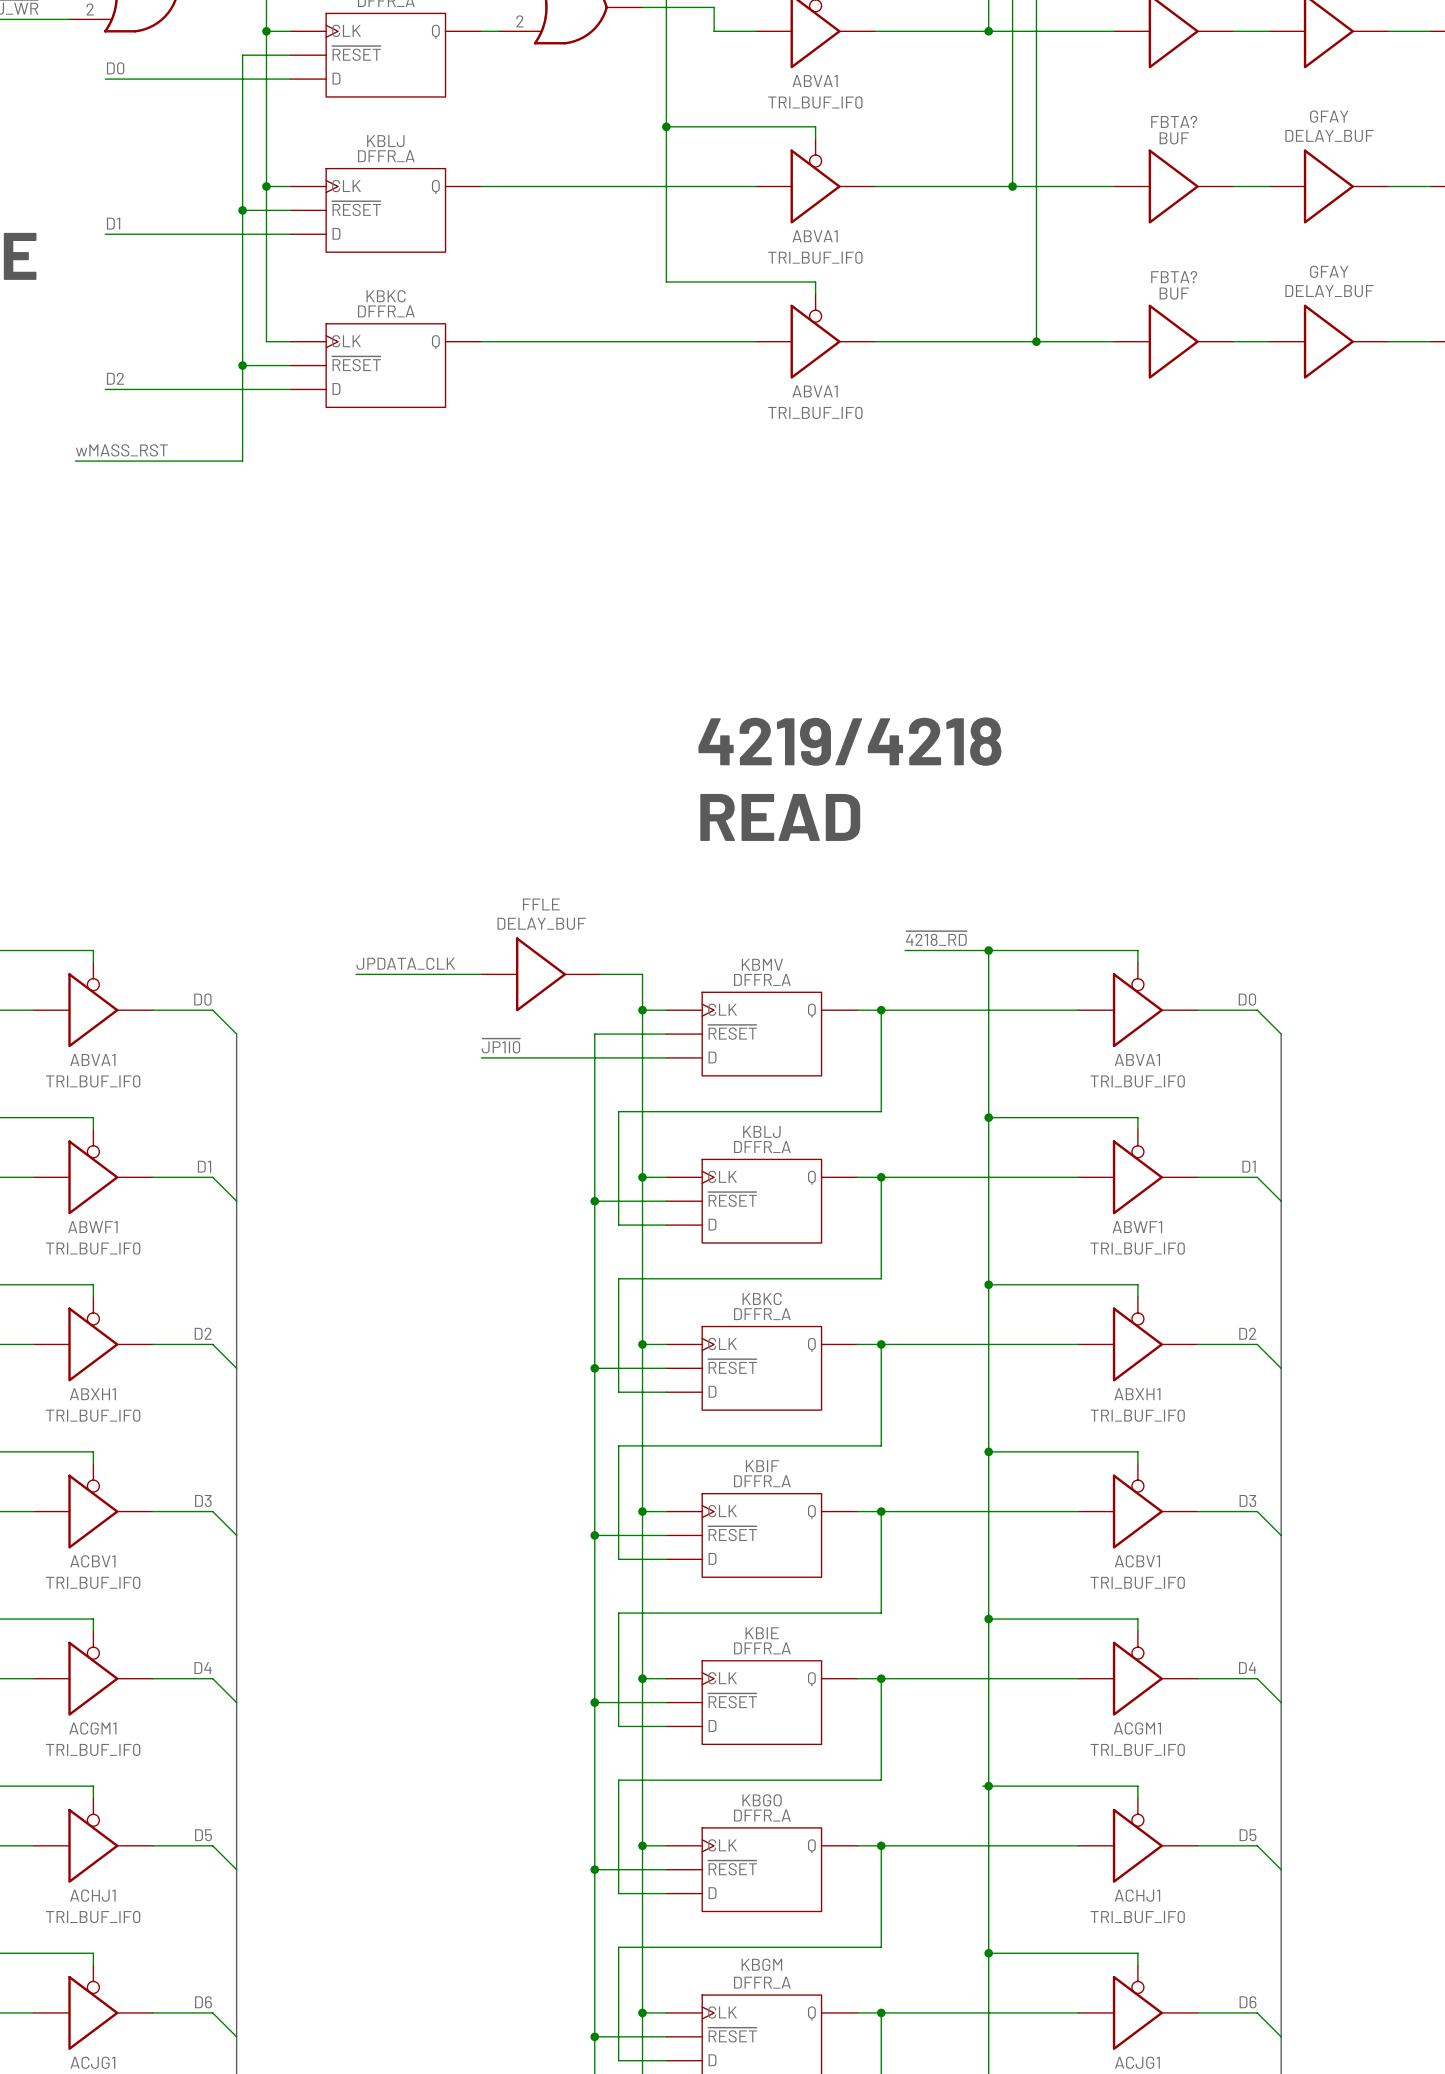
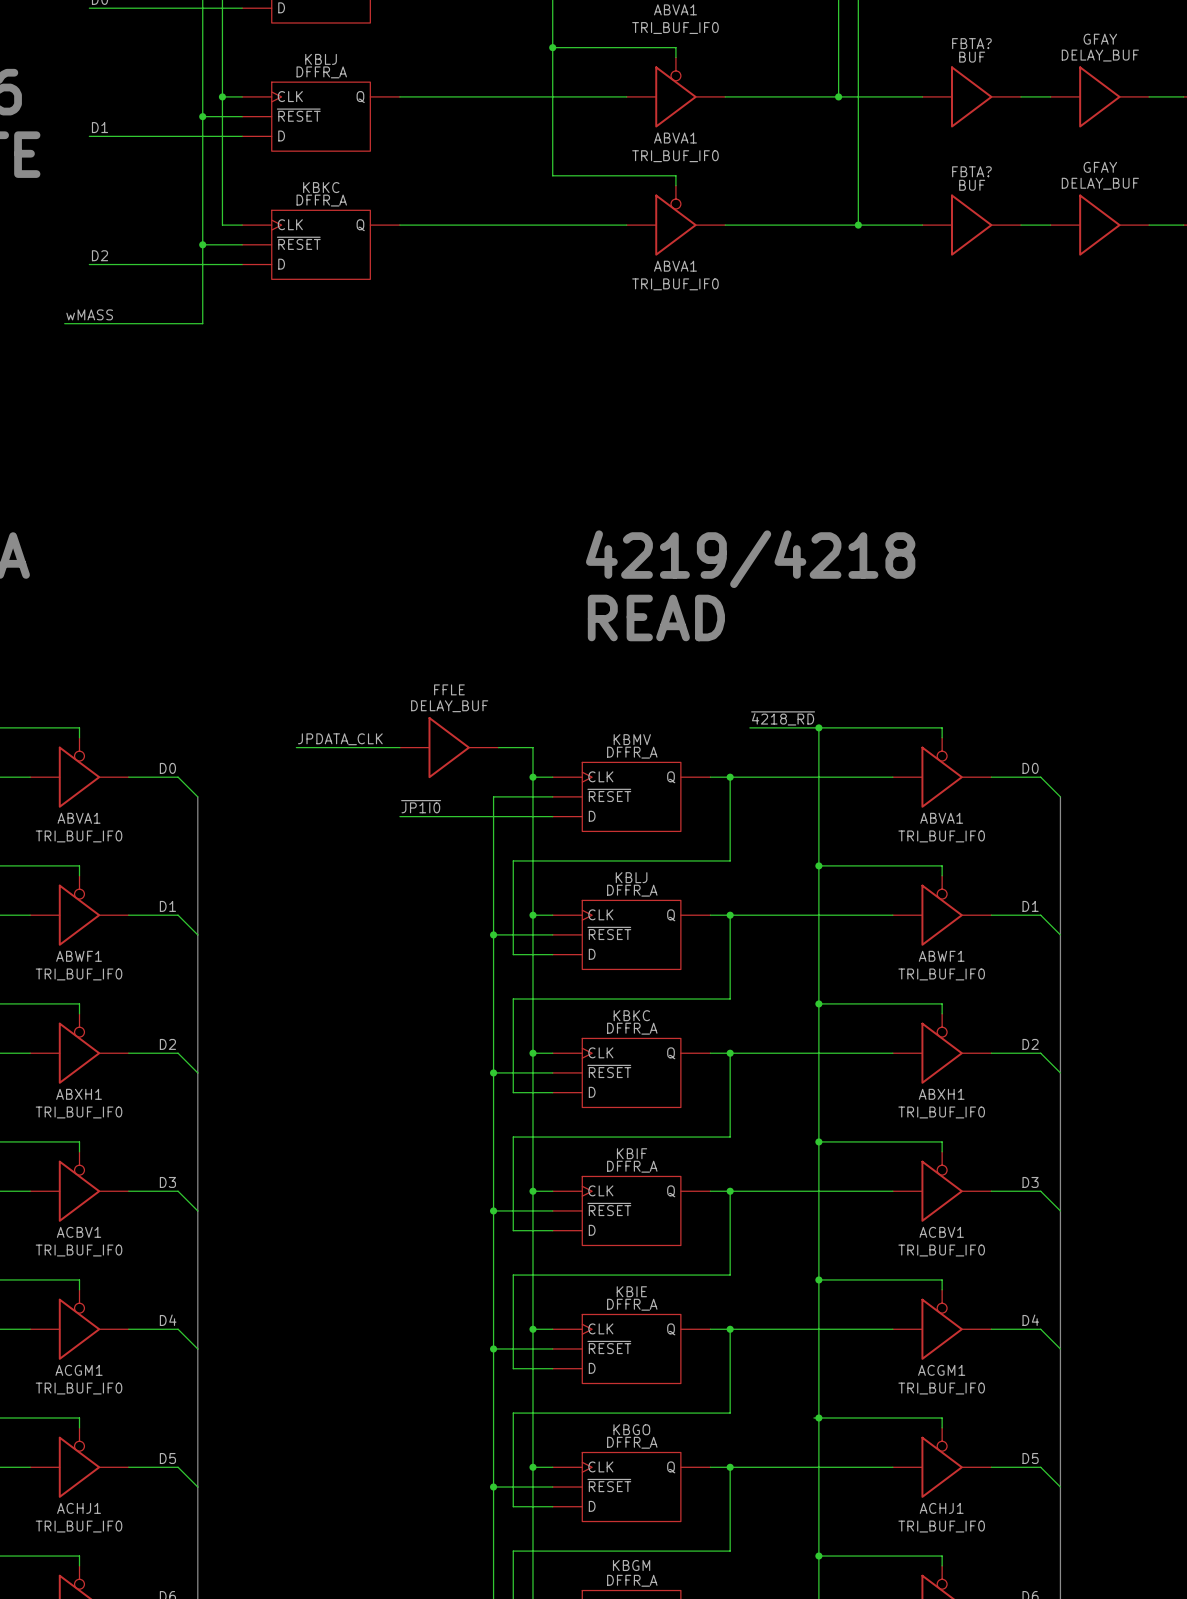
label: wMASS_RST (121, 450) -> wMASS (89, 314)

